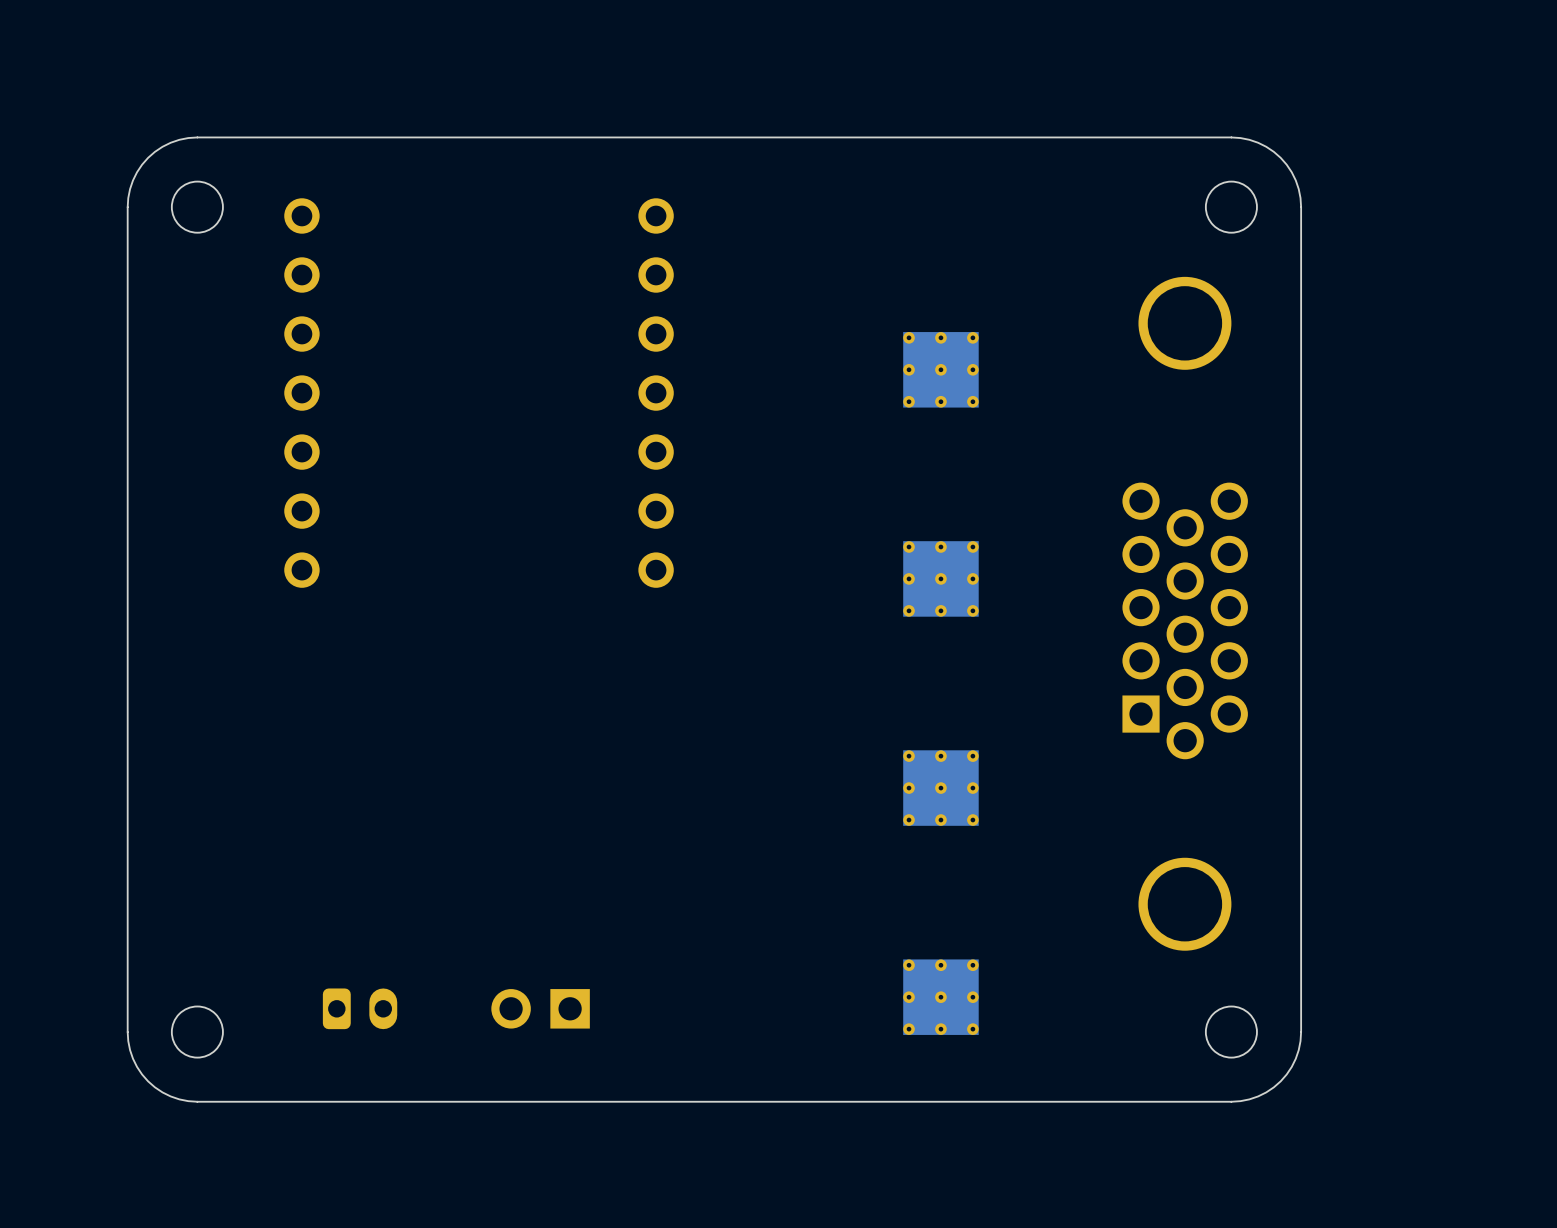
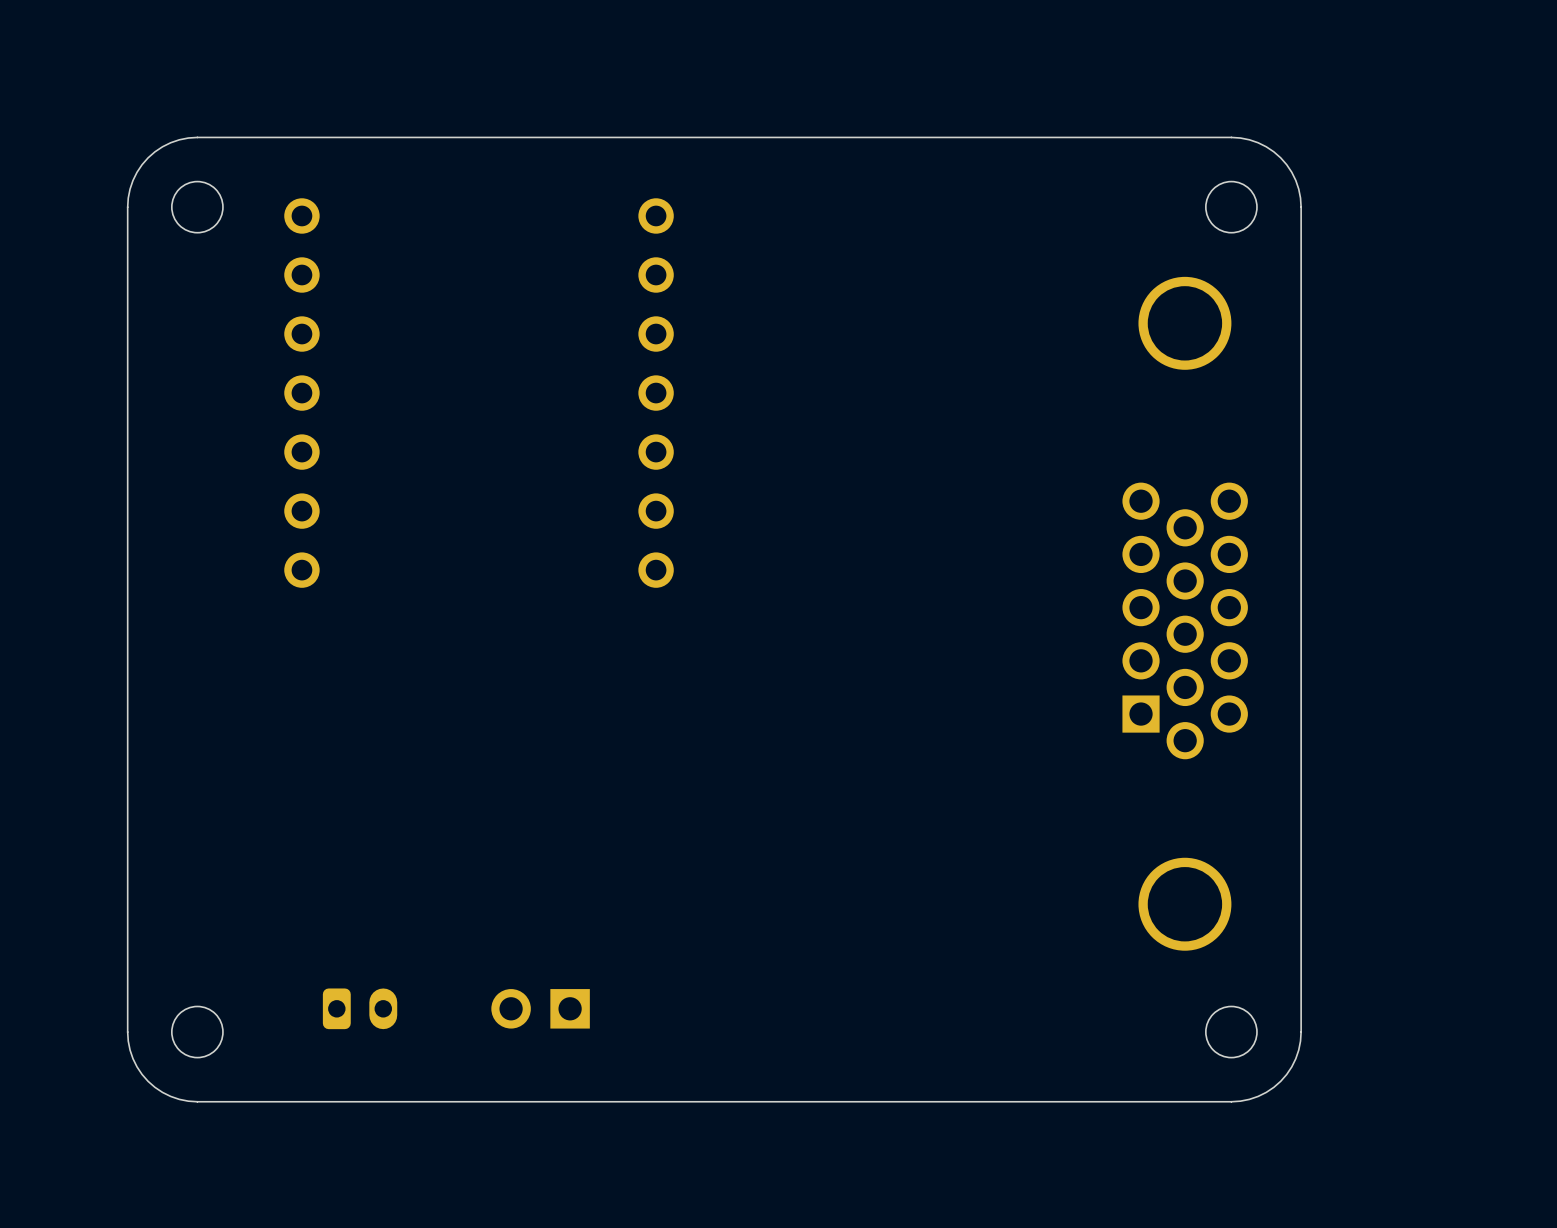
part: (940, 369) -> none
part: (940, 578) -> none
part: (940, 788) -> none
part: (940, 997) -> none

